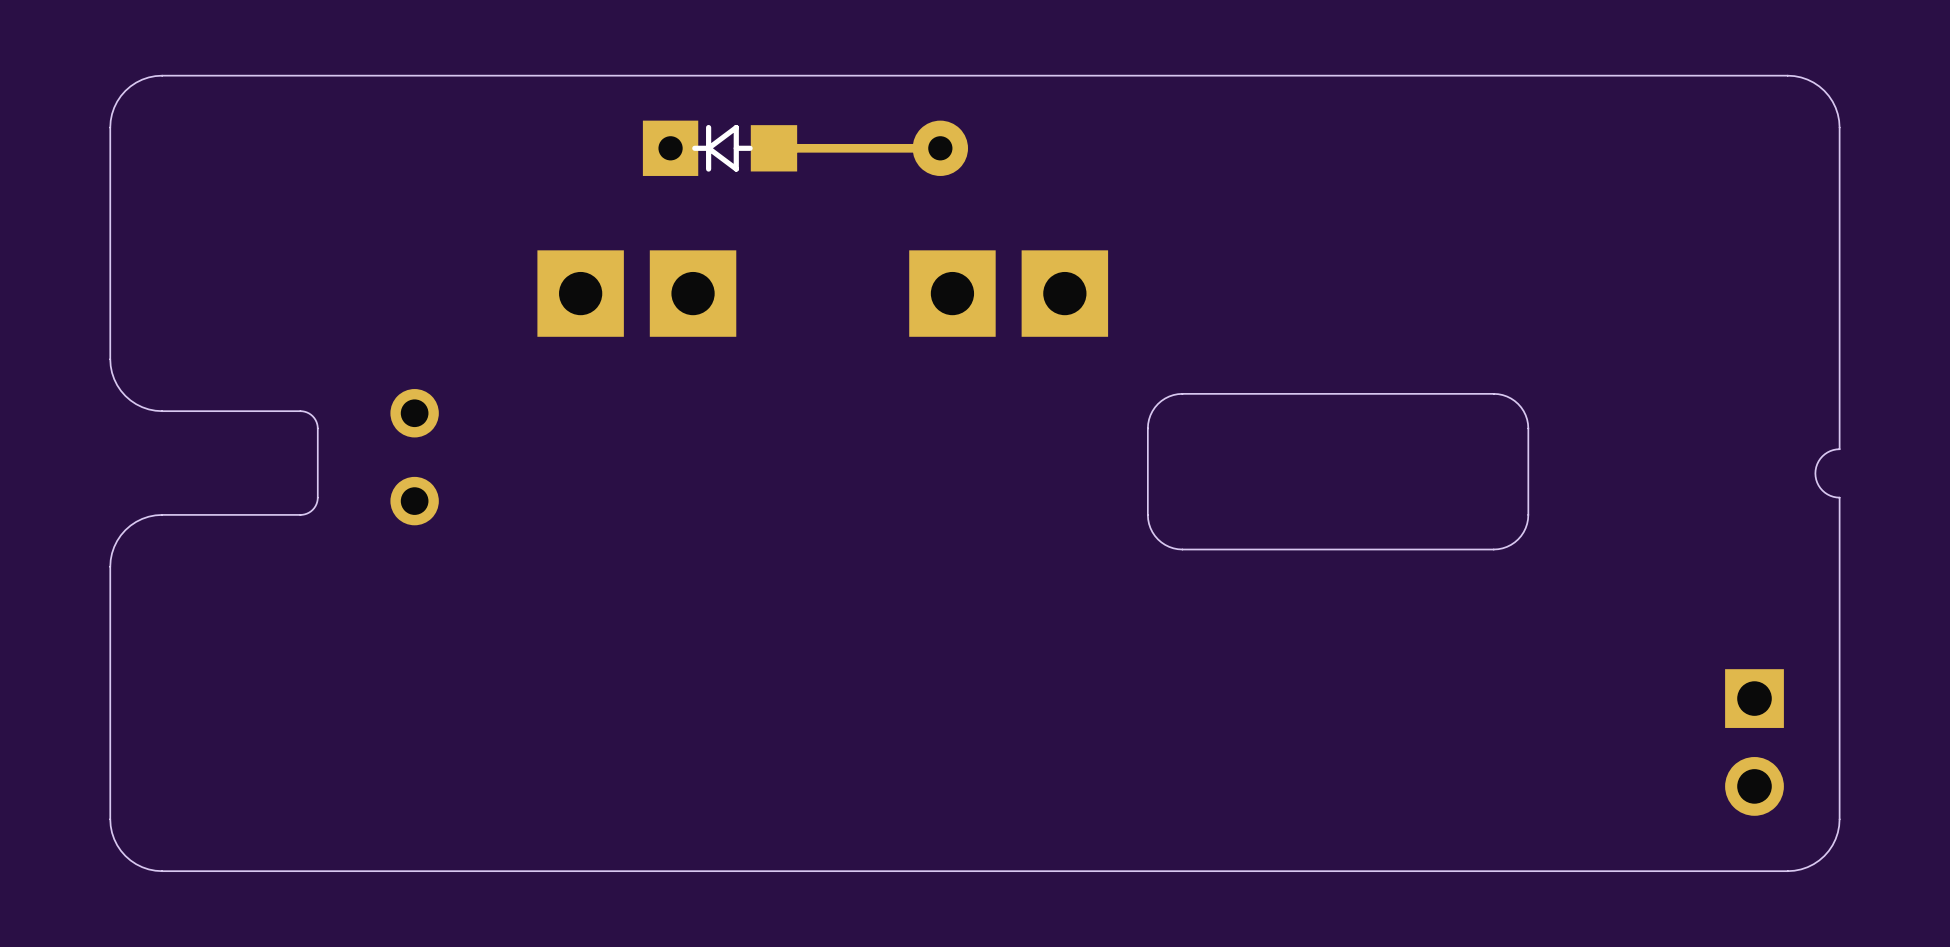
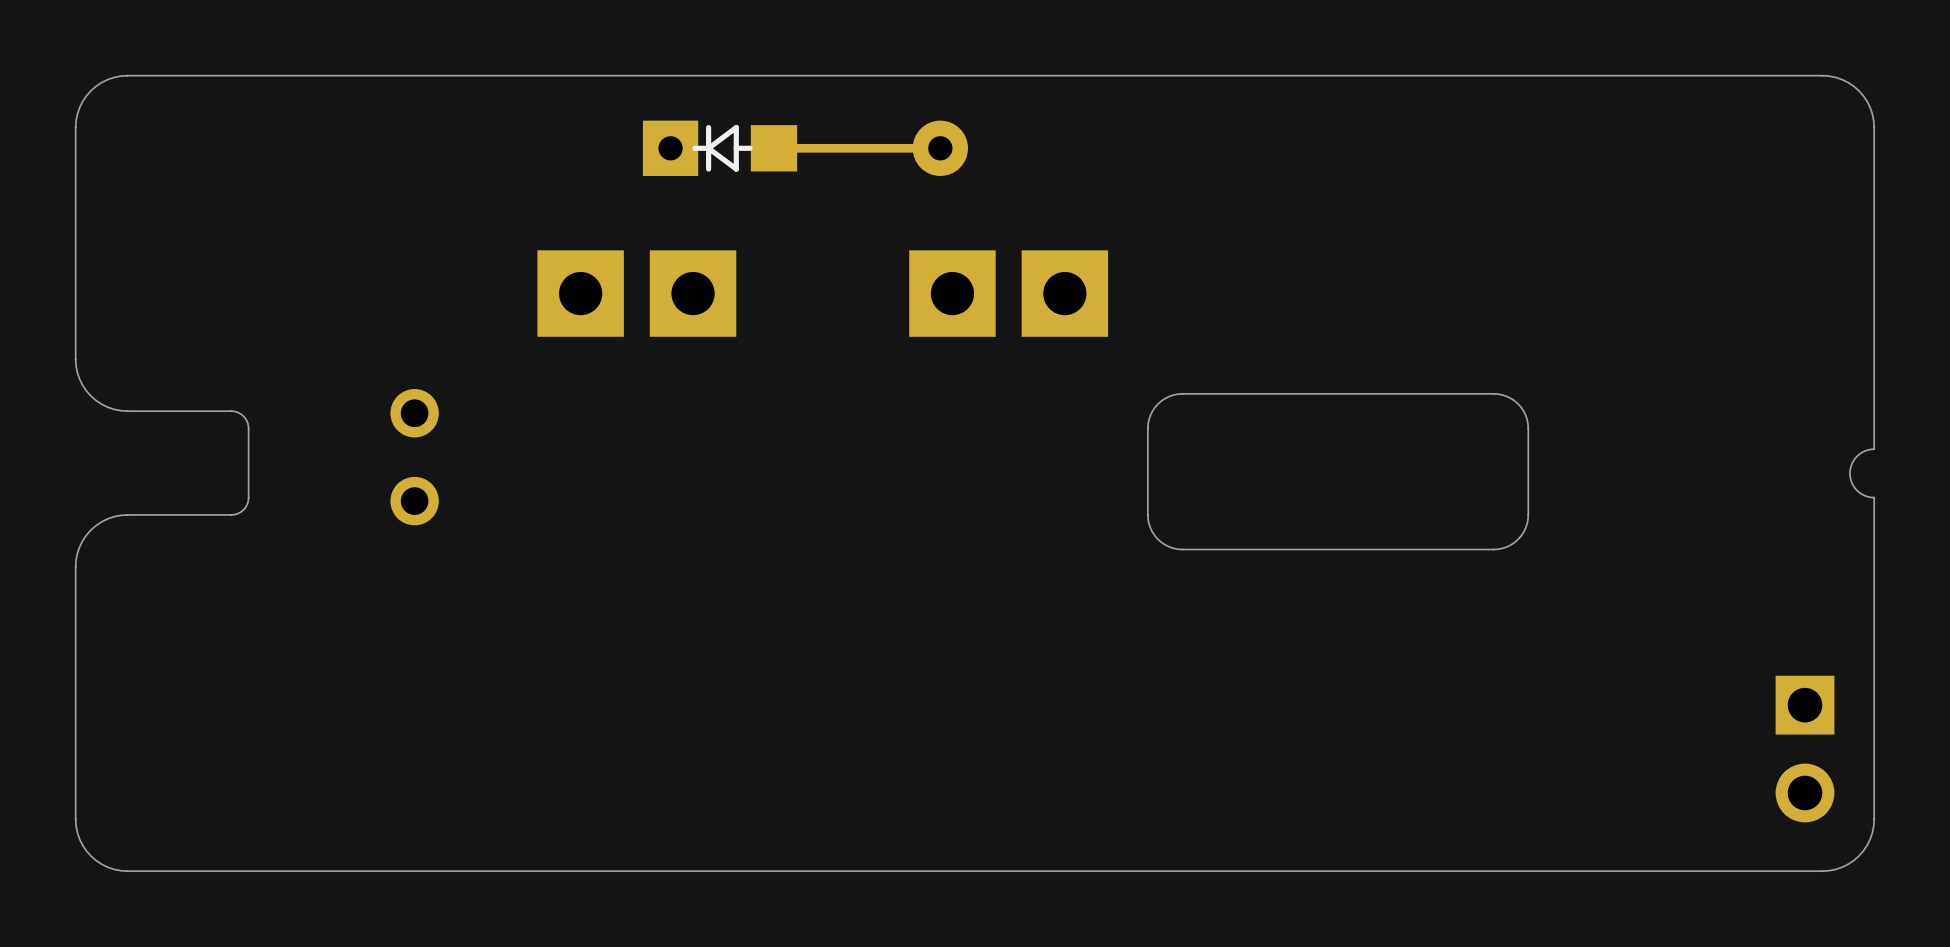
board edge: (162, 75) (142, 79) (125, 90) (114, 107) (110, 127) (110, 366) (117, 385) (130, 400) (148, 409) (162, 411) -> (162, 75) (120, 76) (101, 82) (90, 90) (82, 101) (77, 114) (75, 127) (75, 359) (77, 372) (86, 390) (95, 400) (107, 407) (120, 410) (162, 411)
board edge: (1787, 75) (1807, 79) (1824, 90) (1835, 107) (1839, 127) (1839, 449) (1830, 451) (1822, 456) (1817, 464) (1815, 473) (1817, 482) (1822, 490) (1830, 495) (1839, 497) (1839, 826) (1832, 845) (1819, 860) (1807, 867) (1787, 871) -> (1787, 75) (1829, 76) (1848, 82) (1858, 90) (1867, 101) (1872, 114) (1874, 127) (1874, 449) (1864, 451) (1857, 456) (1851, 464) (1849, 473) (1851, 482) (1857, 490) (1864, 495) (1874, 497) (1873, 826) (1870, 839) (1863, 850) (1848, 864) (1829, 870) (1787, 871)
board edge: (231, 411) (304, 411) (314, 417) (317, 428) (317, 497) (312, 509) (300, 514) (231, 514) -> (231, 411) (243, 416) (248, 428) (248, 502) (241, 511) (231, 514)
board edge: (162, 514) (142, 518) (125, 530) (114, 546) (110, 566) (110, 826) (117, 845) (130, 860) (142, 867) (162, 871) -> (162, 514) (120, 515) (101, 521) (90, 530) (82, 540) (77, 553) (75, 566) (75, 819) (77, 832) (86, 850) (95, 860) (107, 867) (120, 870) (162, 871)
part position: (1754, 742) -> (1805, 749)

